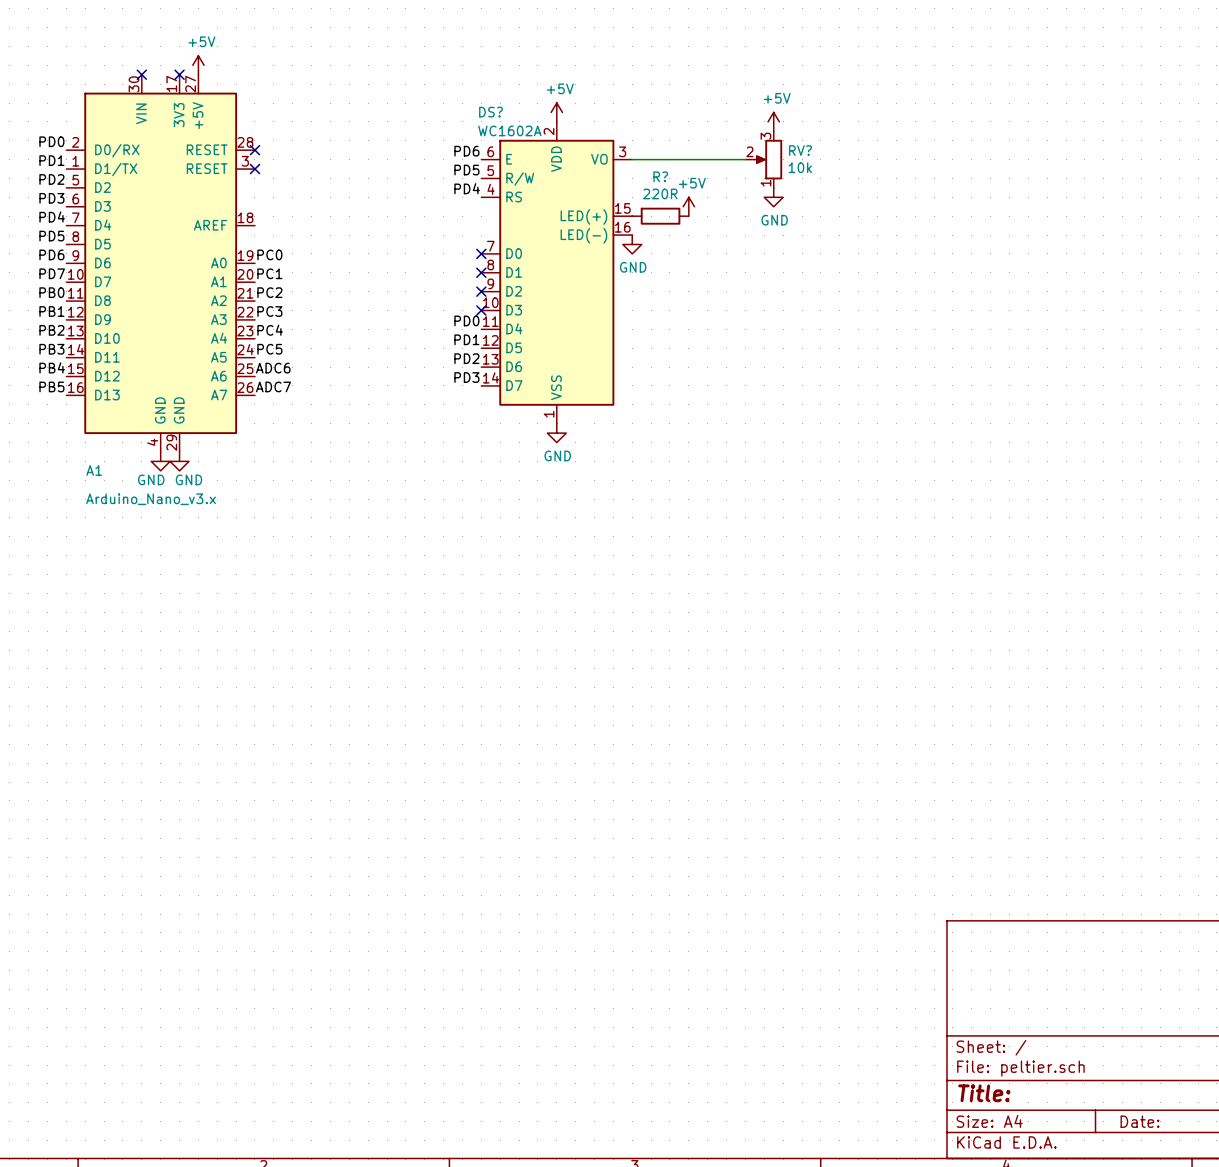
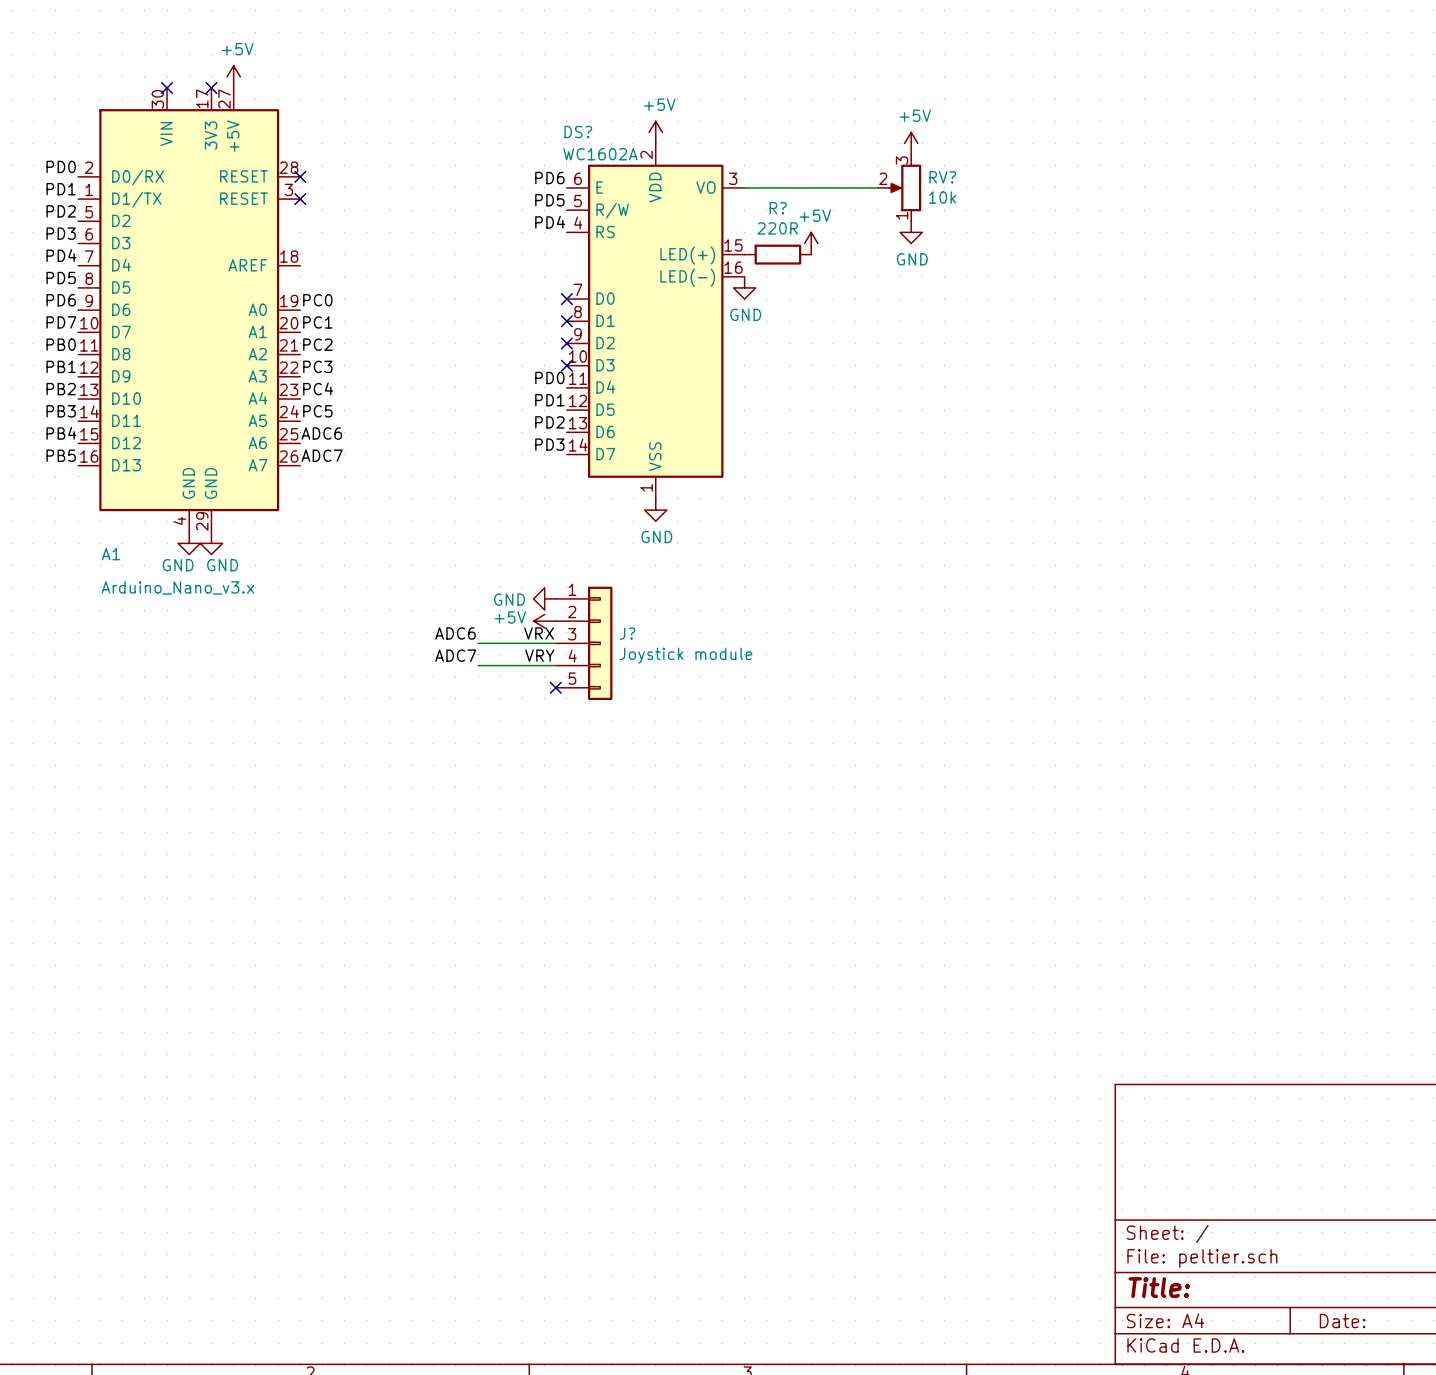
power symbol: none -> GND (544, 598)
power symbol: none -> +5V (544, 621)
label: none -> ADC6 (455, 633)
label: none -> VRX (539, 633)
wire: none -> (478, 643) (555, 643)
J?: none -> Joystick module (584, 643)
label: none -> ADC7 (455, 655)
label: none -> VRY (539, 655)
wire: none -> (478, 665) (555, 665)
no-connect mark: none -> (555, 687)

